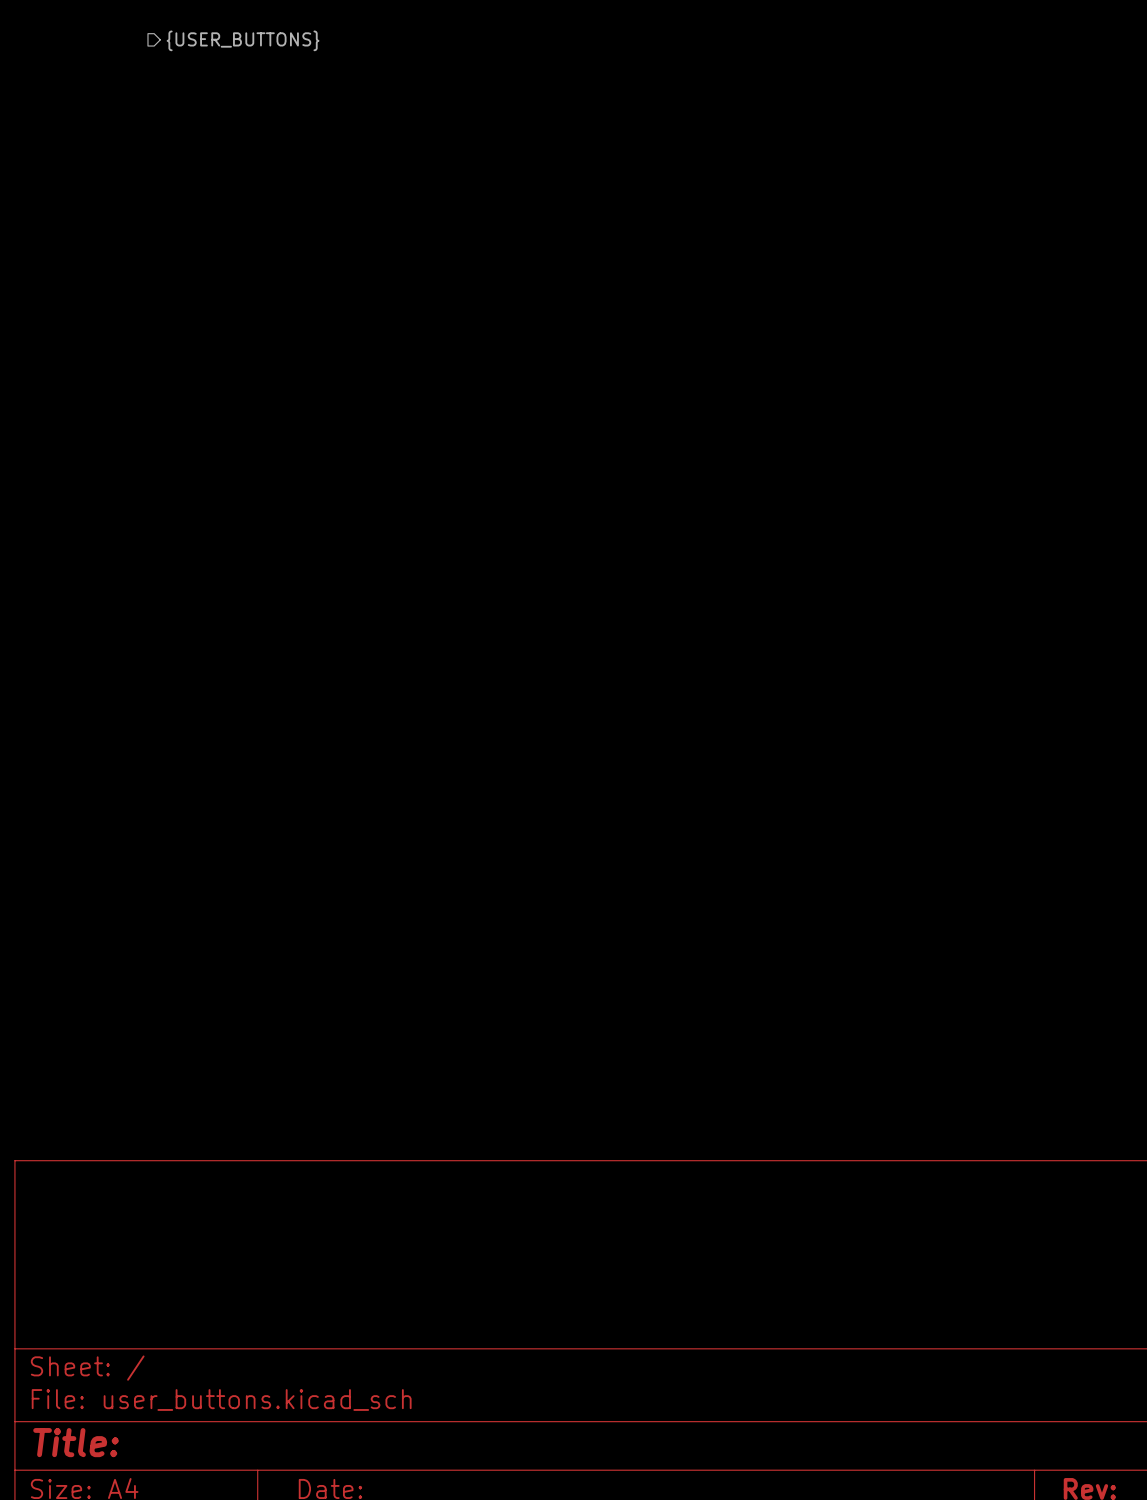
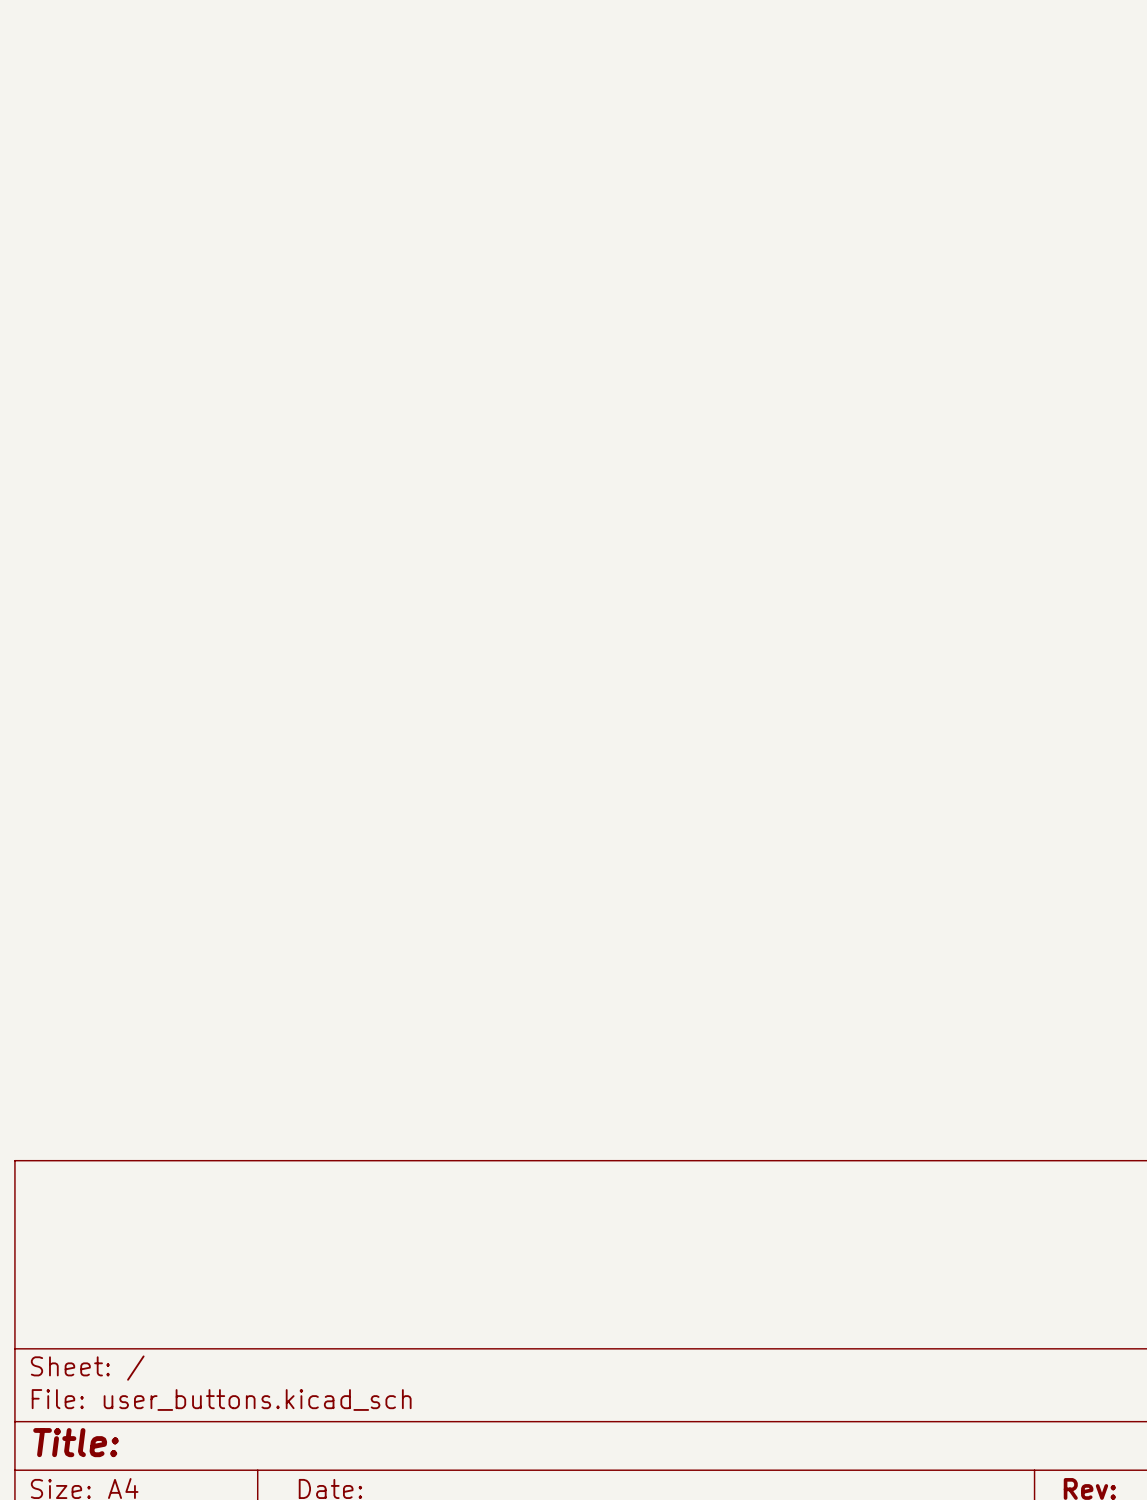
hierarchical label: {USER_BUTTONS} (243, 40) -> none

